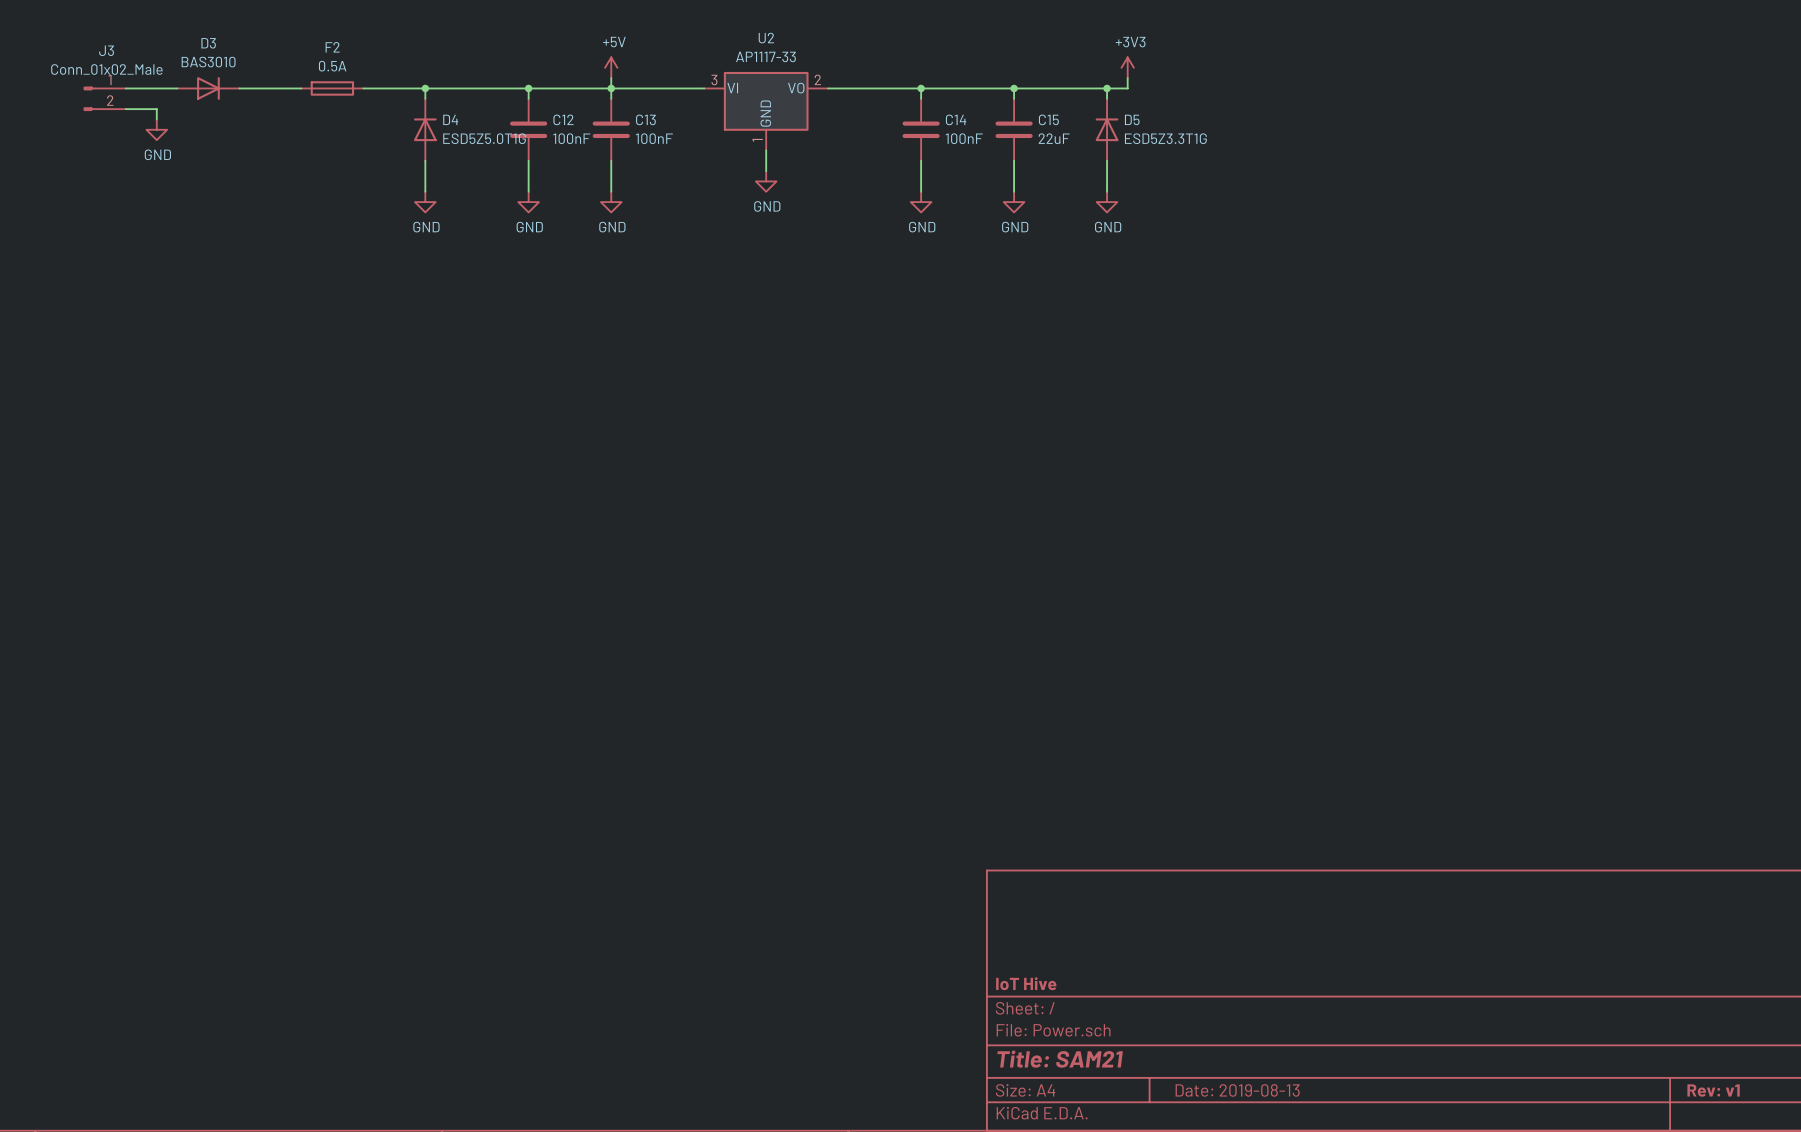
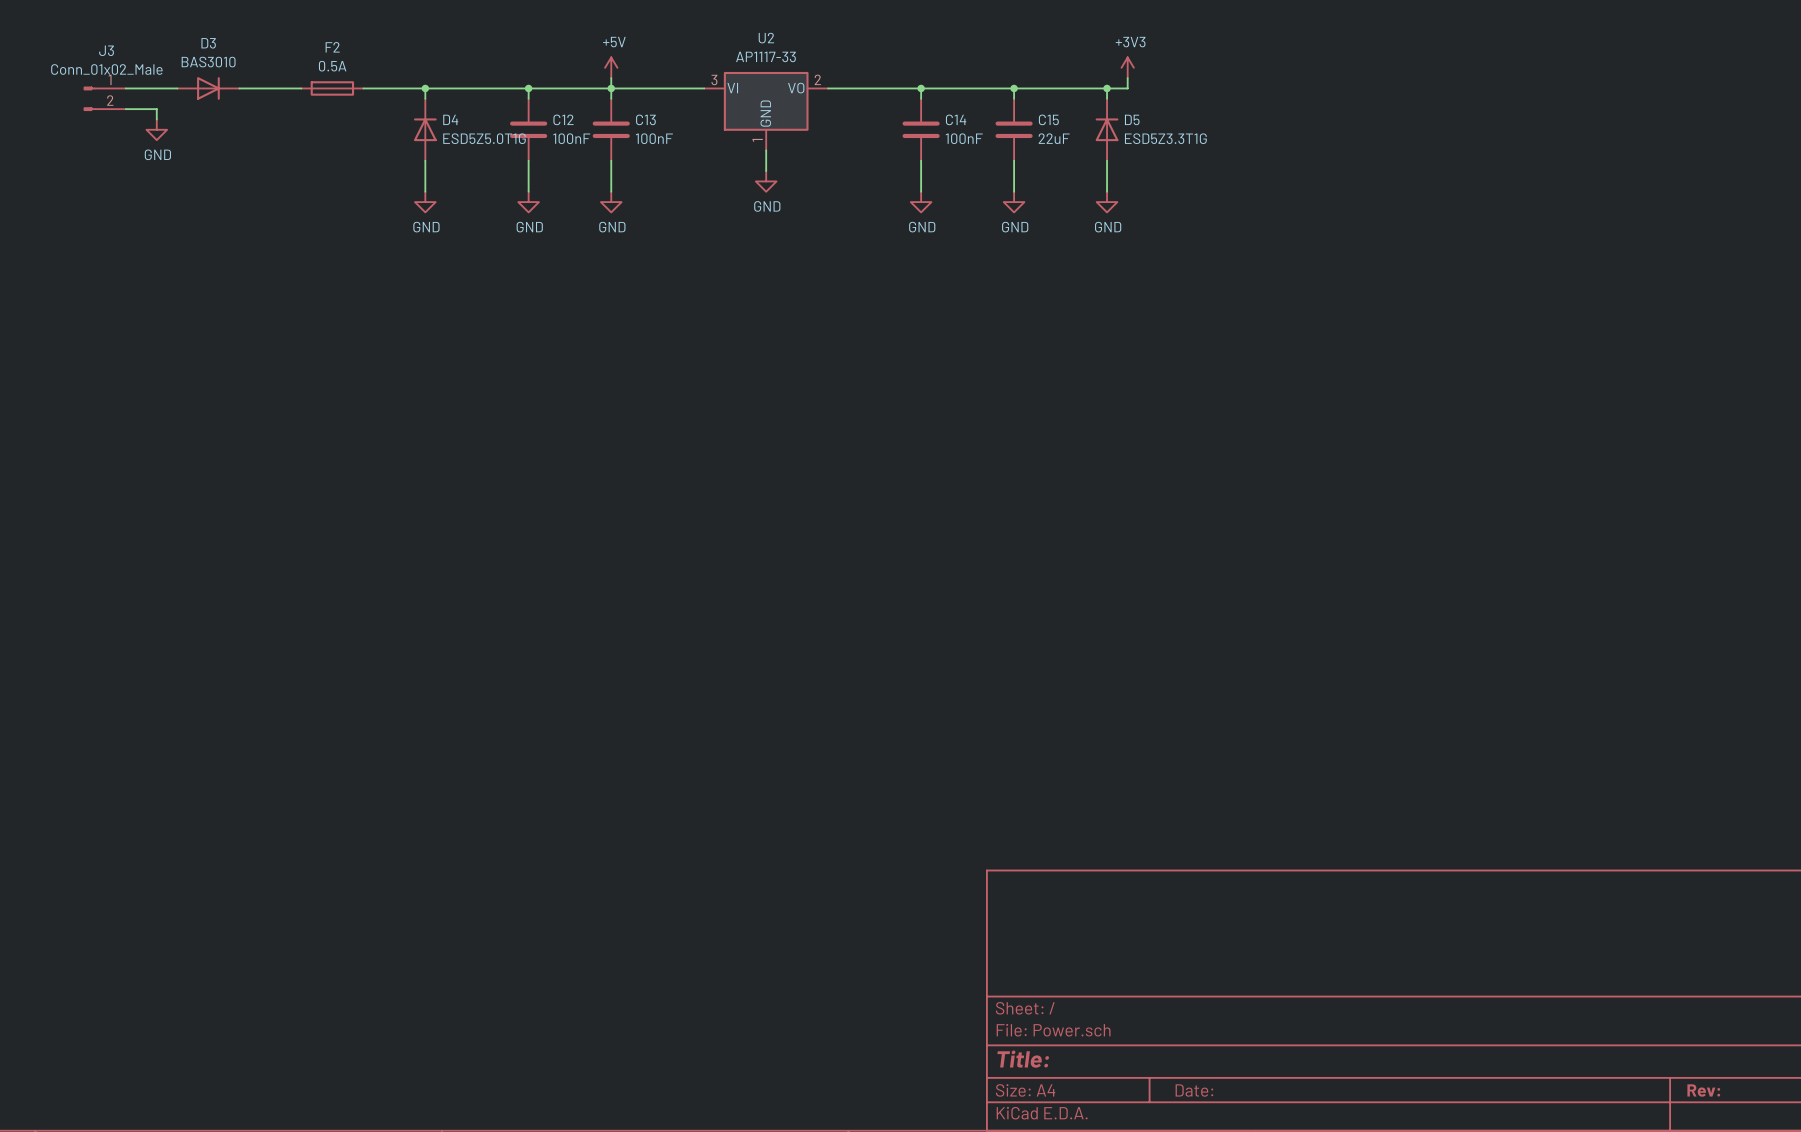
title block: IoT Hive (1026, 983) -> none
title block: Title: SAM21 (1060, 1059) -> Title: (1023, 1059)
title block: Date: 2019-08-13 (1237, 1090) -> Date: (1194, 1090)
title block: Rev: v1 (1713, 1090) -> Rev: (1703, 1090)

